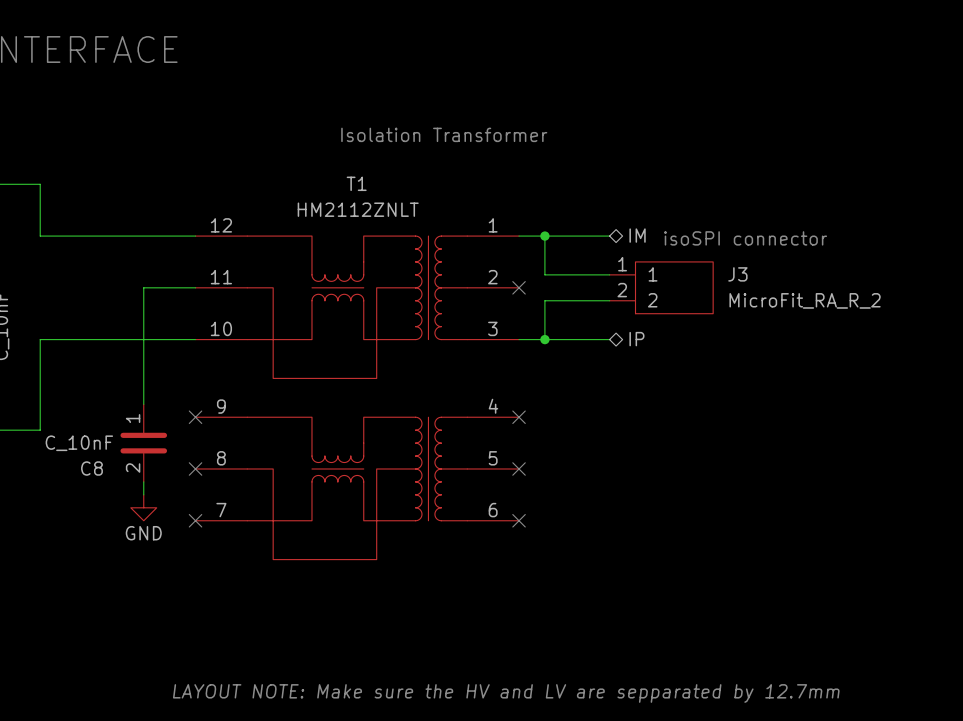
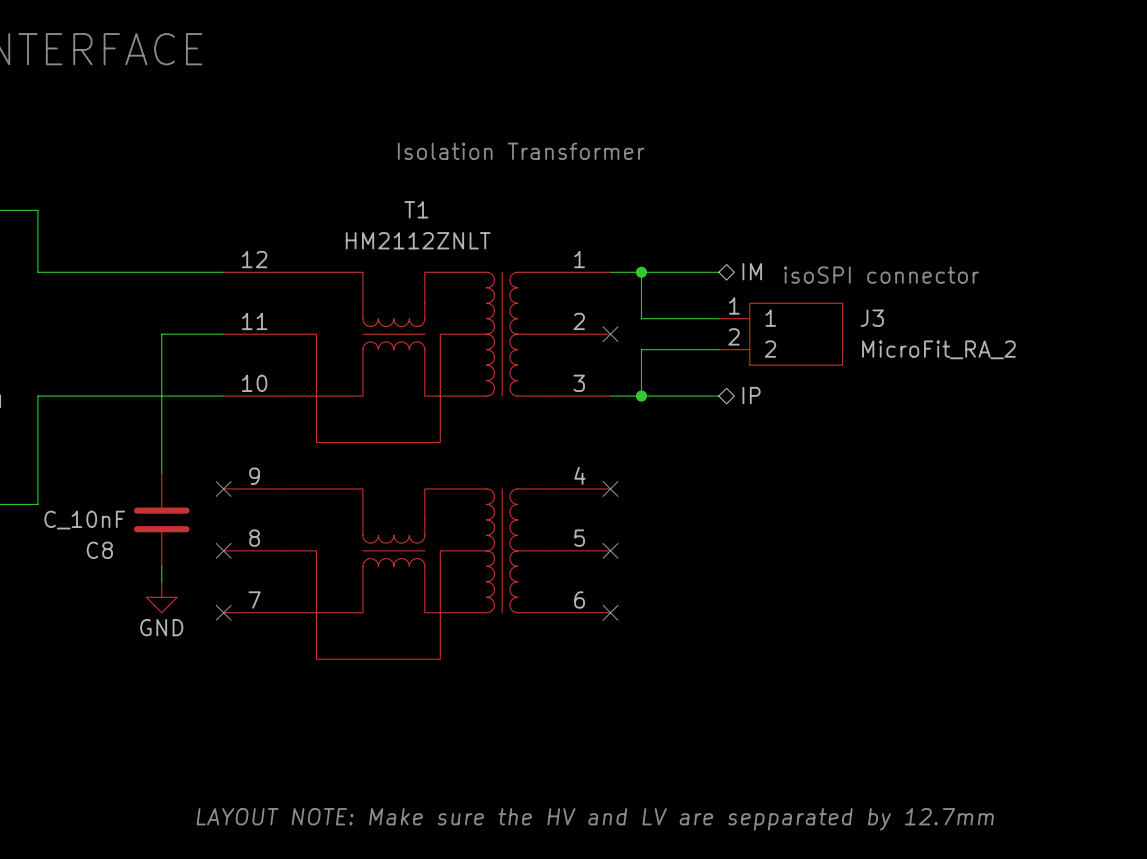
J3 value: MicroFit_RA_R_2 (805, 300) -> MicroFit_RA_2 (938, 349)
C8 pin number: 1 (133, 418) -> none
C8 pin number: 2 (133, 468) -> none

